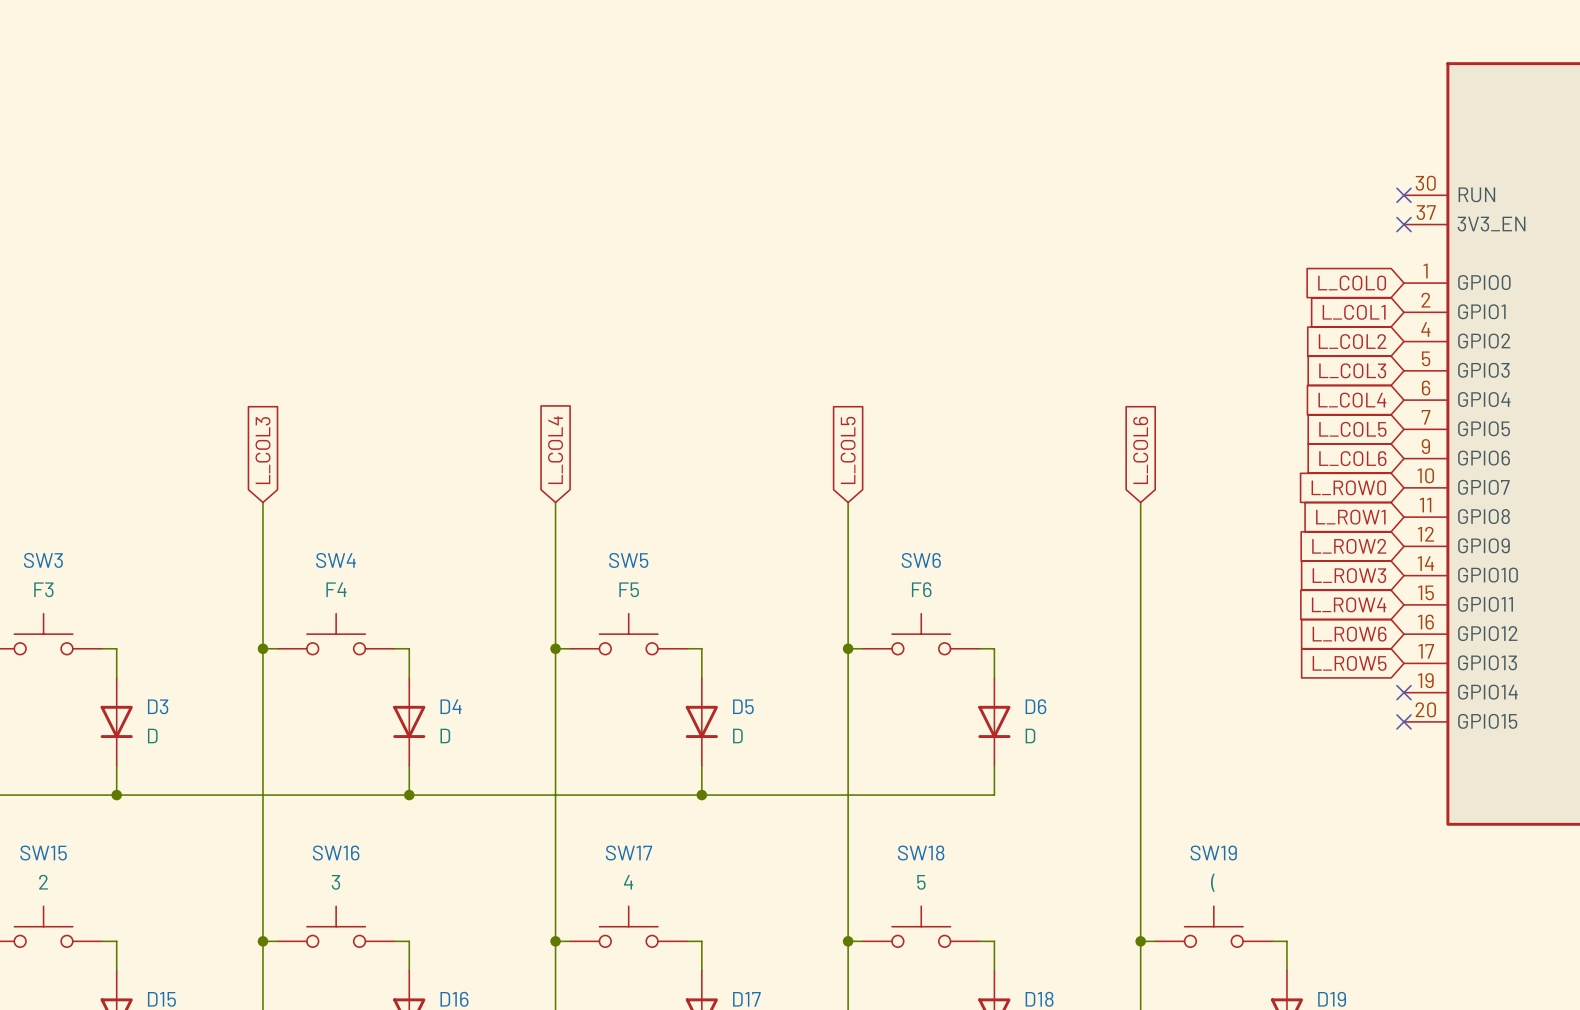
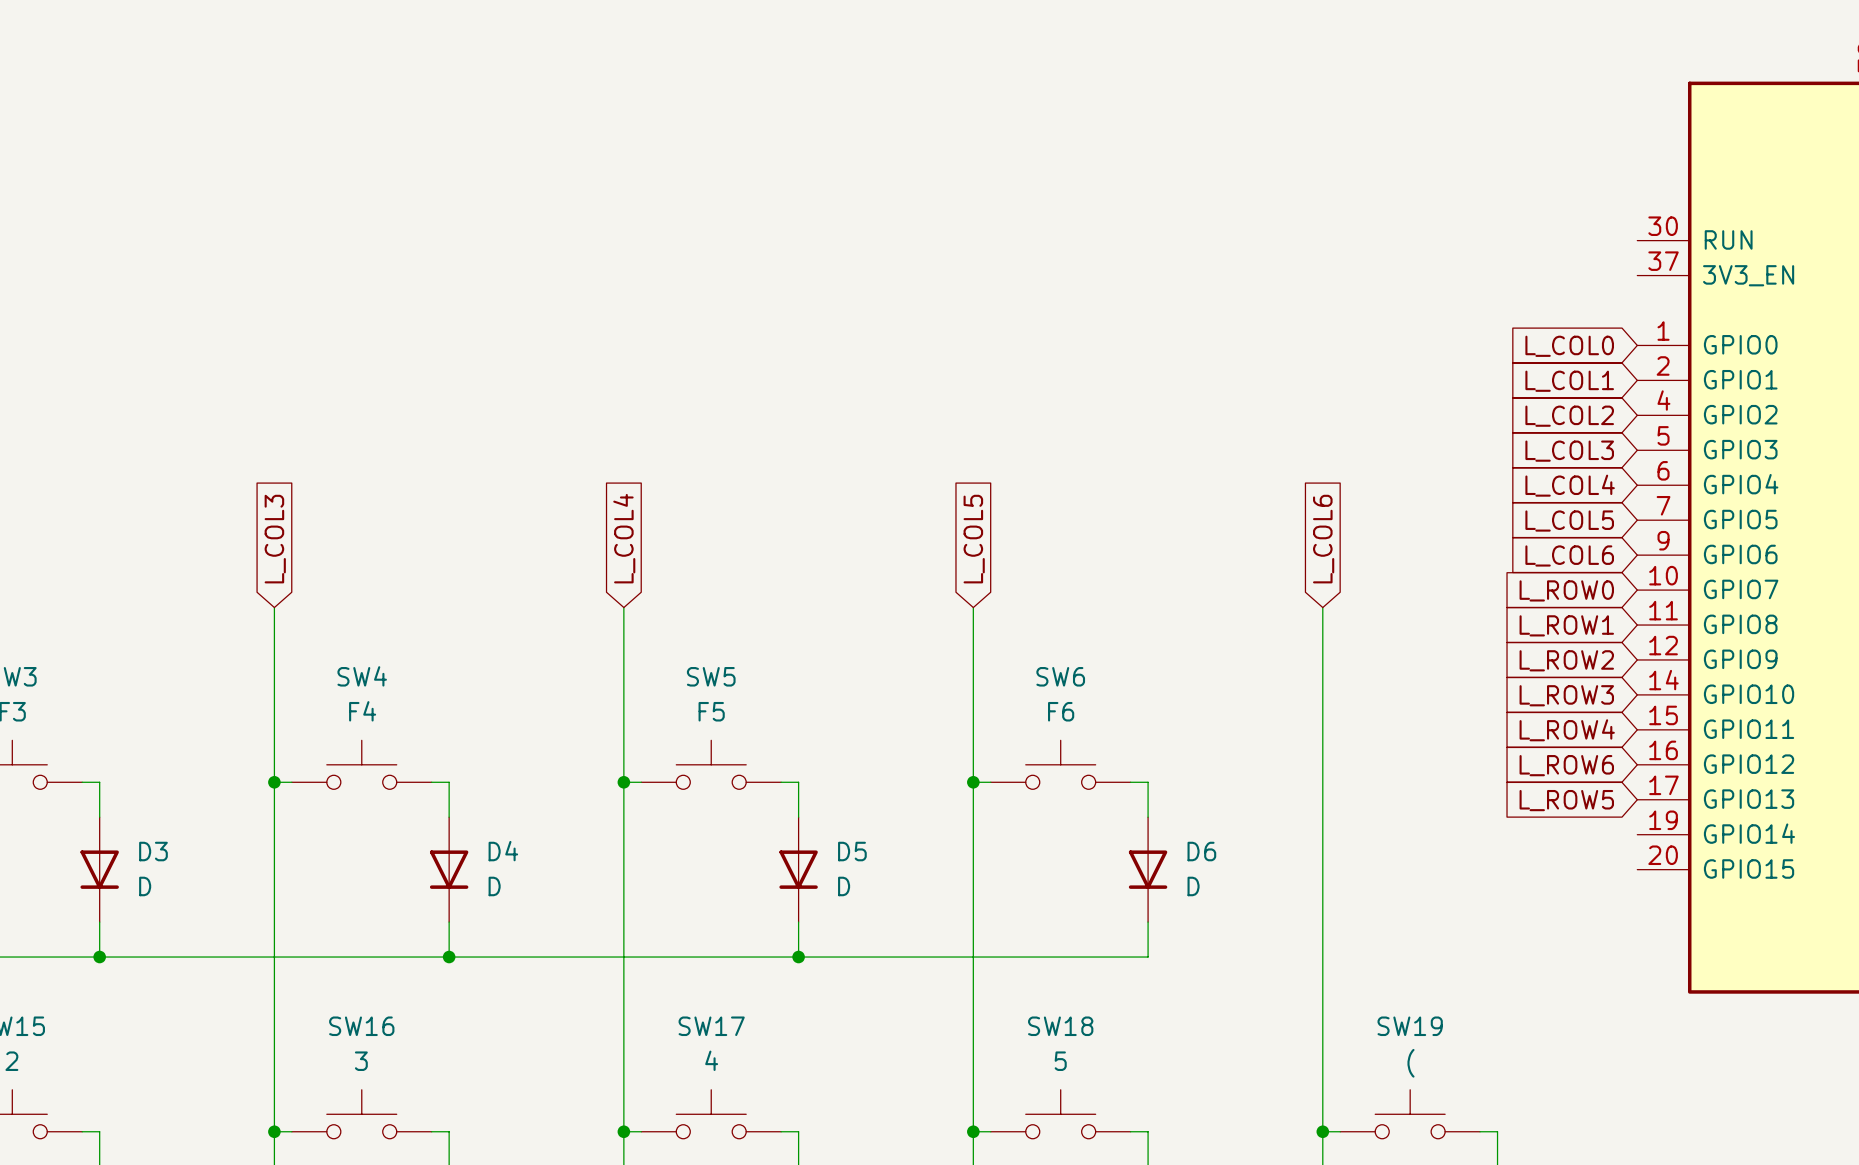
no-connect mark: (1403, 195) -> none
no-connect mark: (1403, 224) -> none
no-connect mark: (1403, 692) -> none
no-connect mark: (1403, 721) -> none

